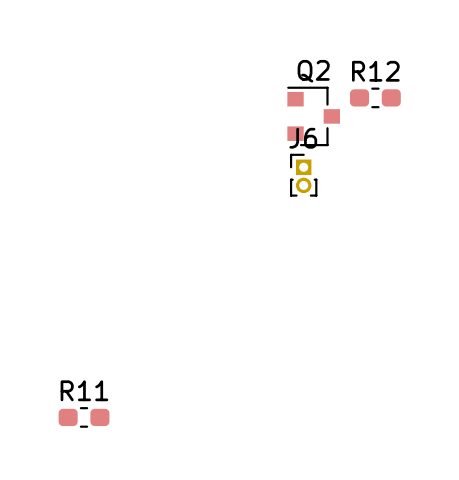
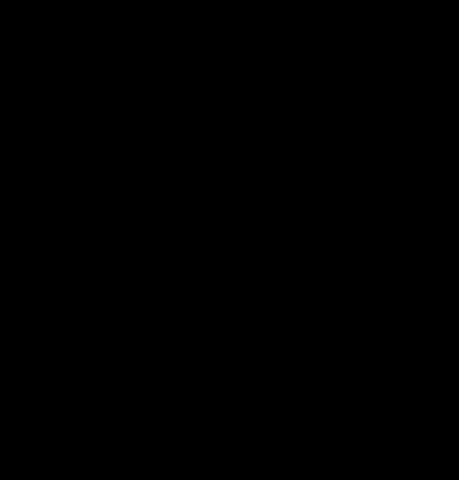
R12: (375, 97) -> none
Q2: (313, 116) -> none
J6: (303, 175) -> none
R11: (84, 417) -> none

